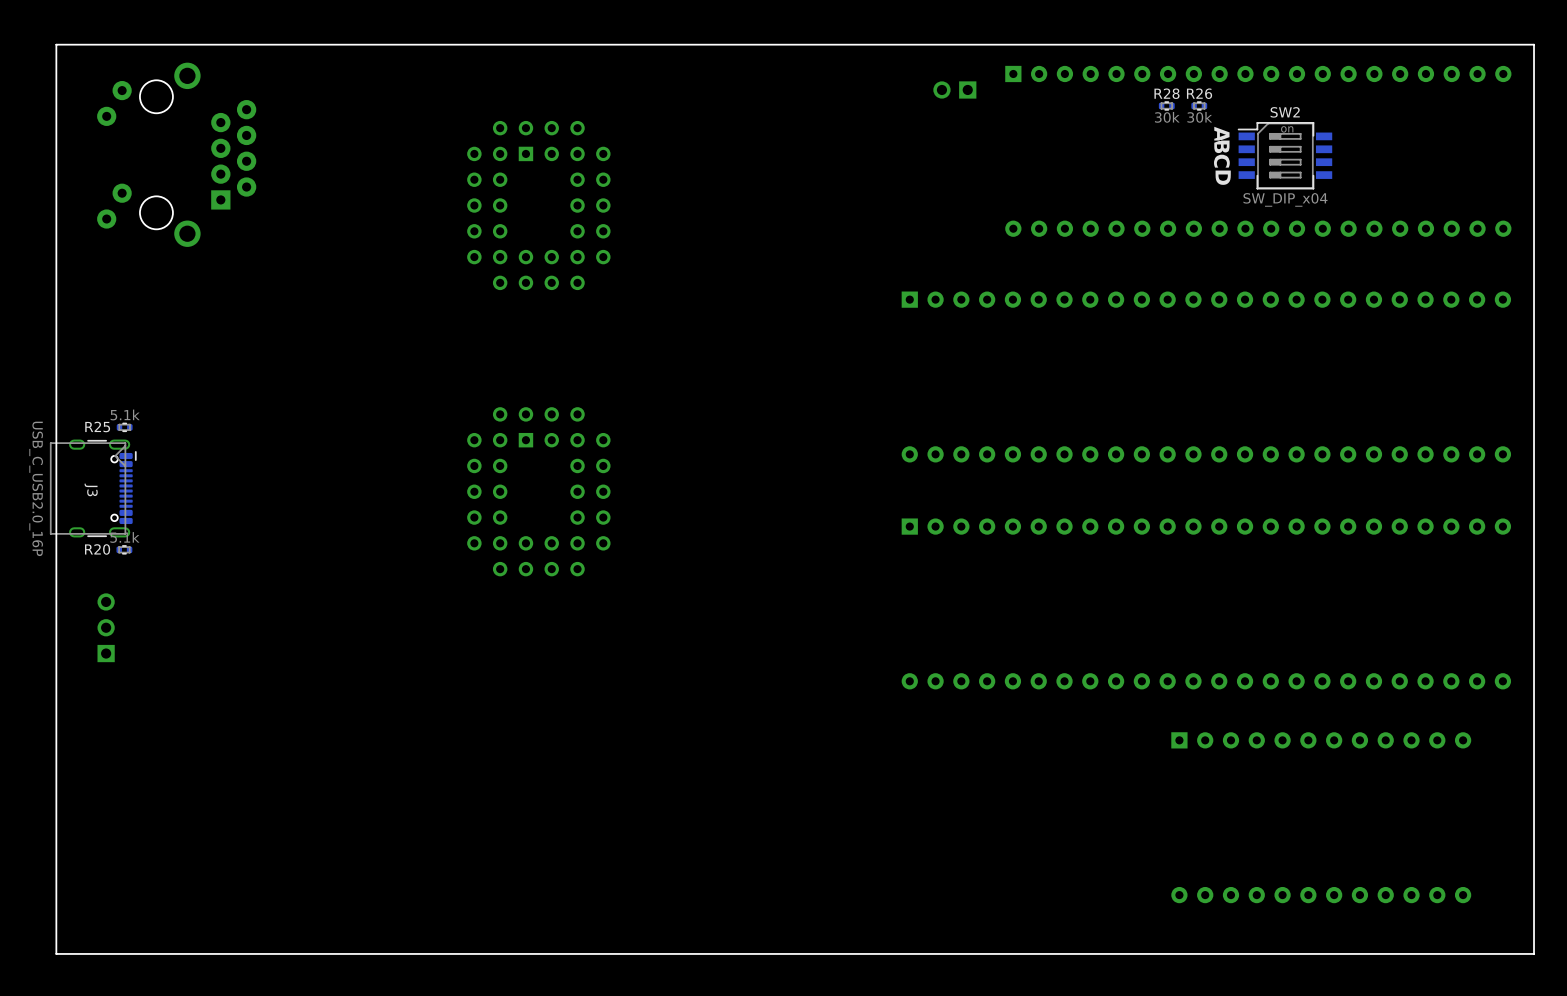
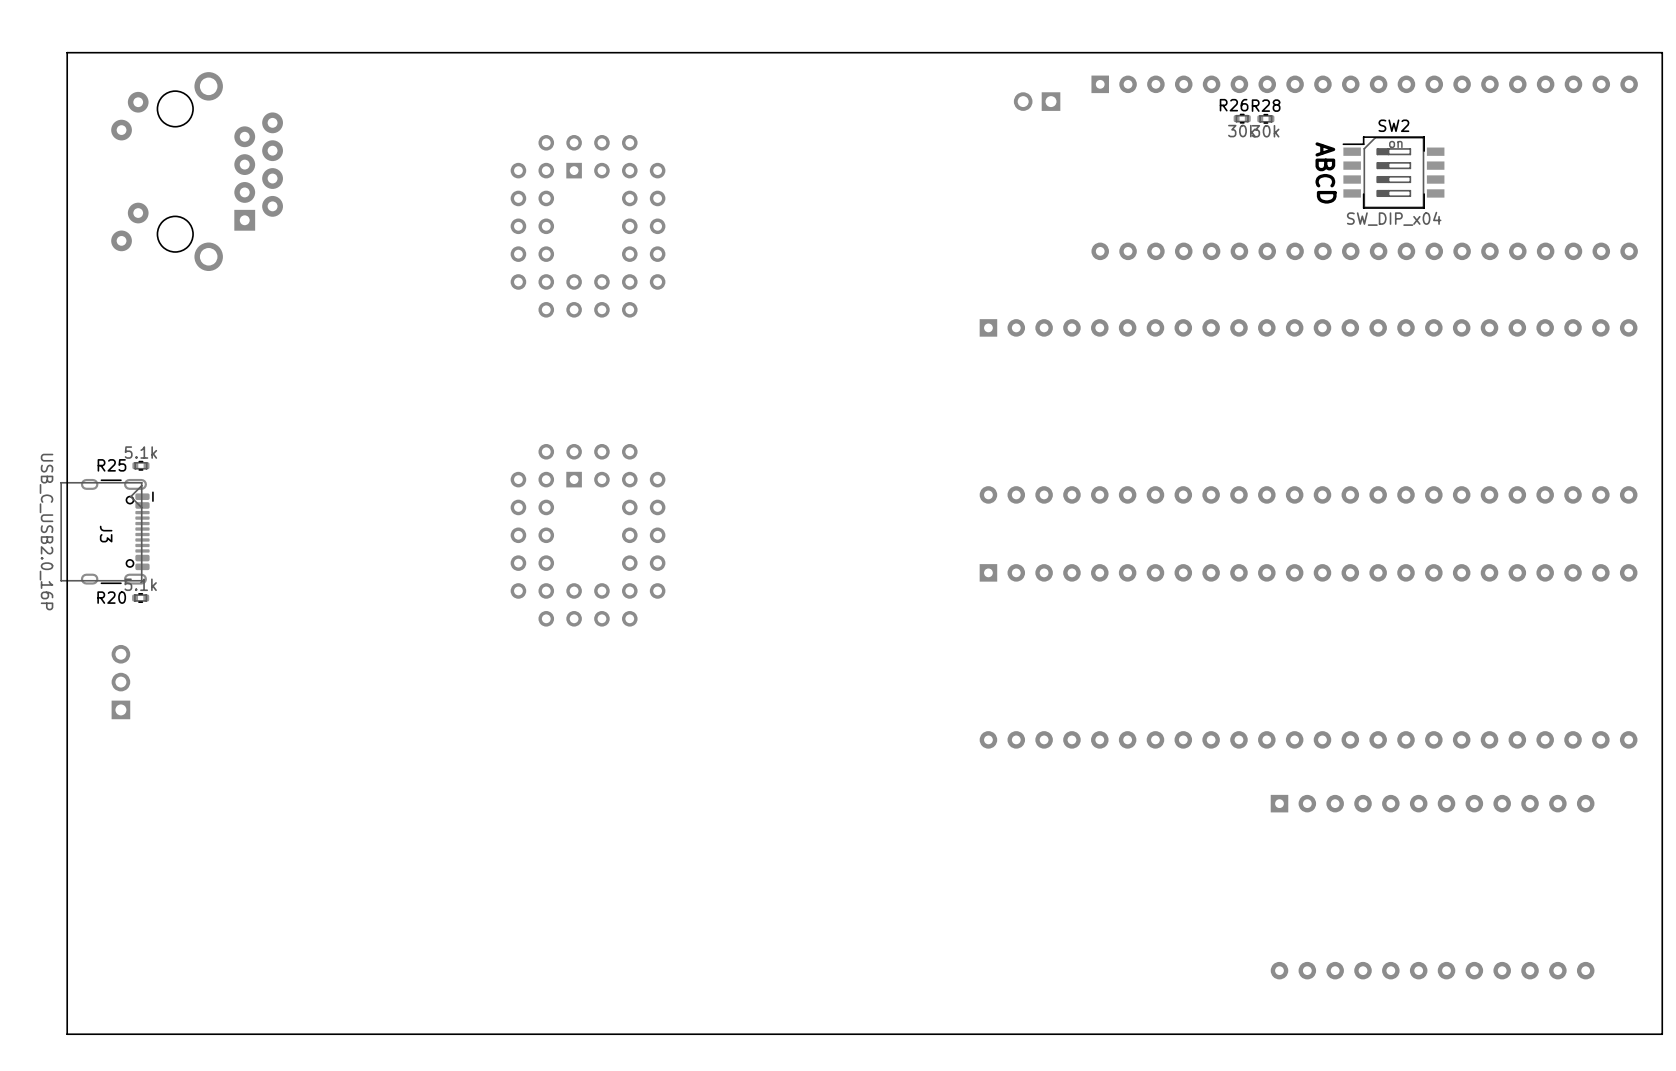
R26 name position: R26 (1199, 93) -> R26 (1234, 105)
R26 position: (1199, 105) -> (1242, 118)

